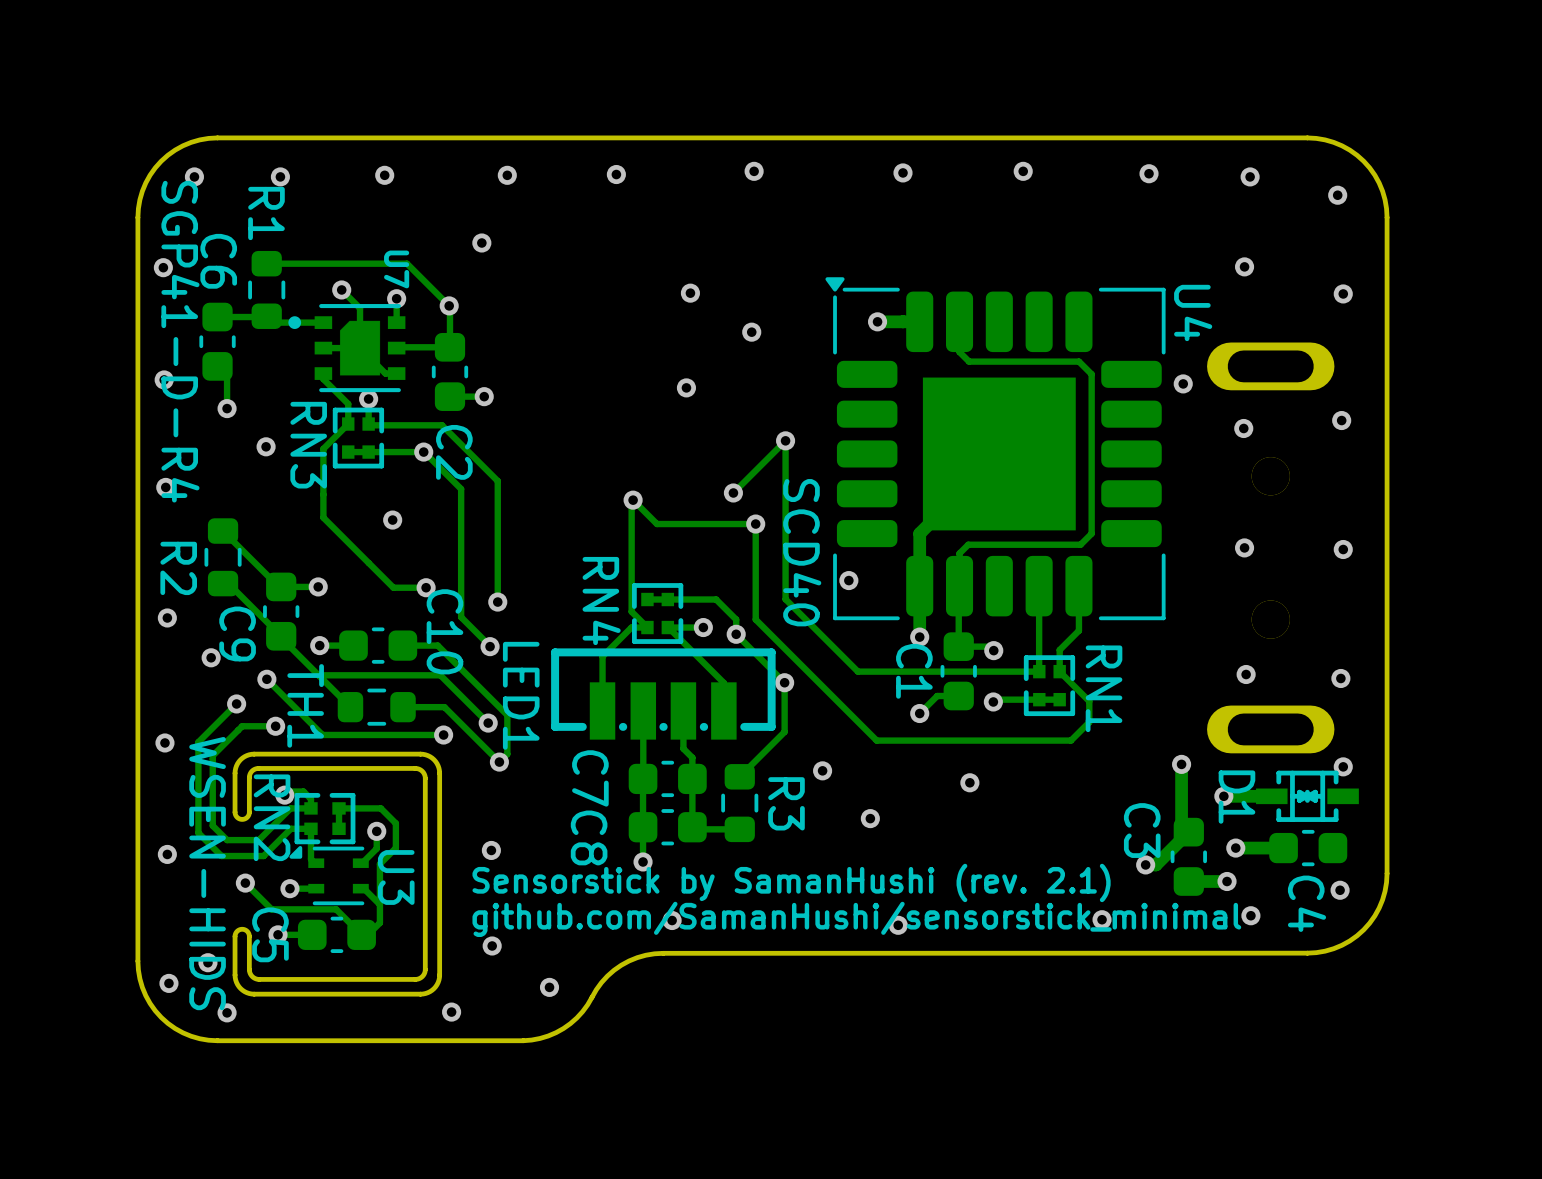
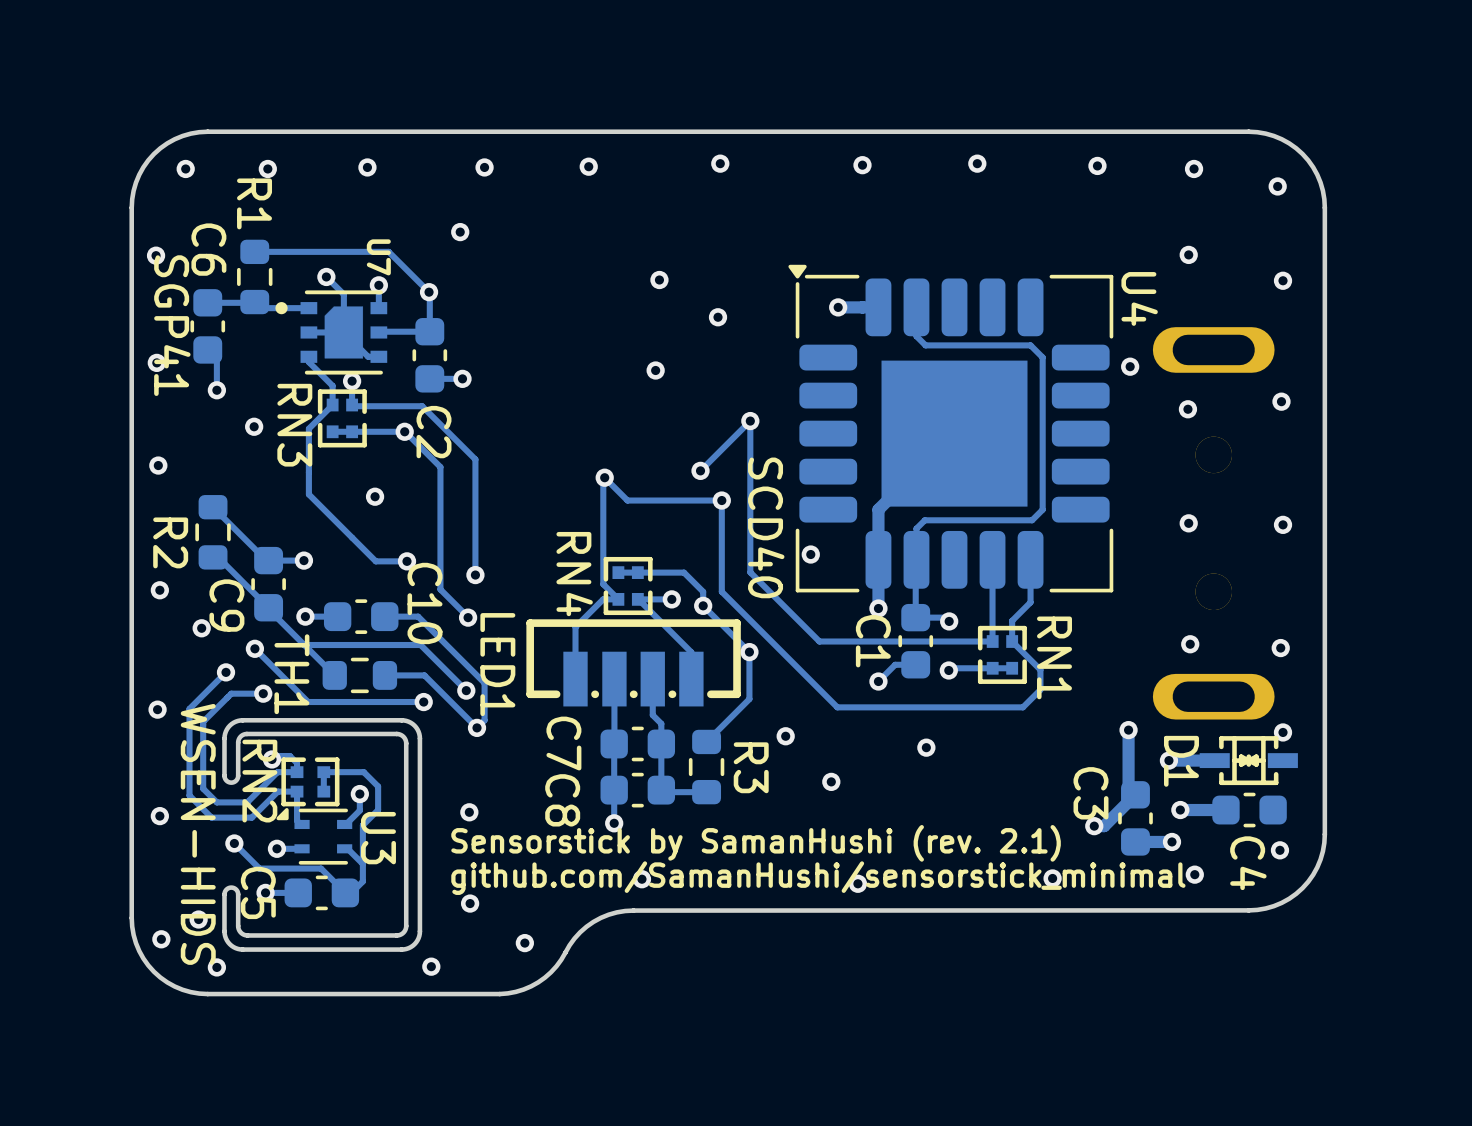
U7 value: SGP41-D-R4 (180, 341) -> SGP41 (172, 325)

